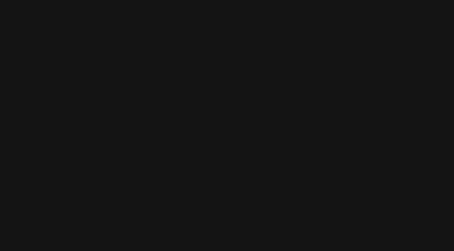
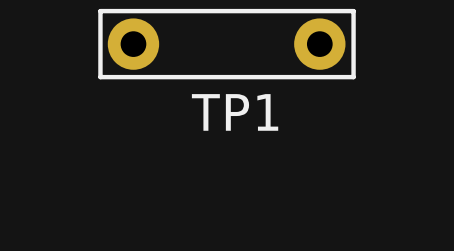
TP1: none -> (227, 44)

